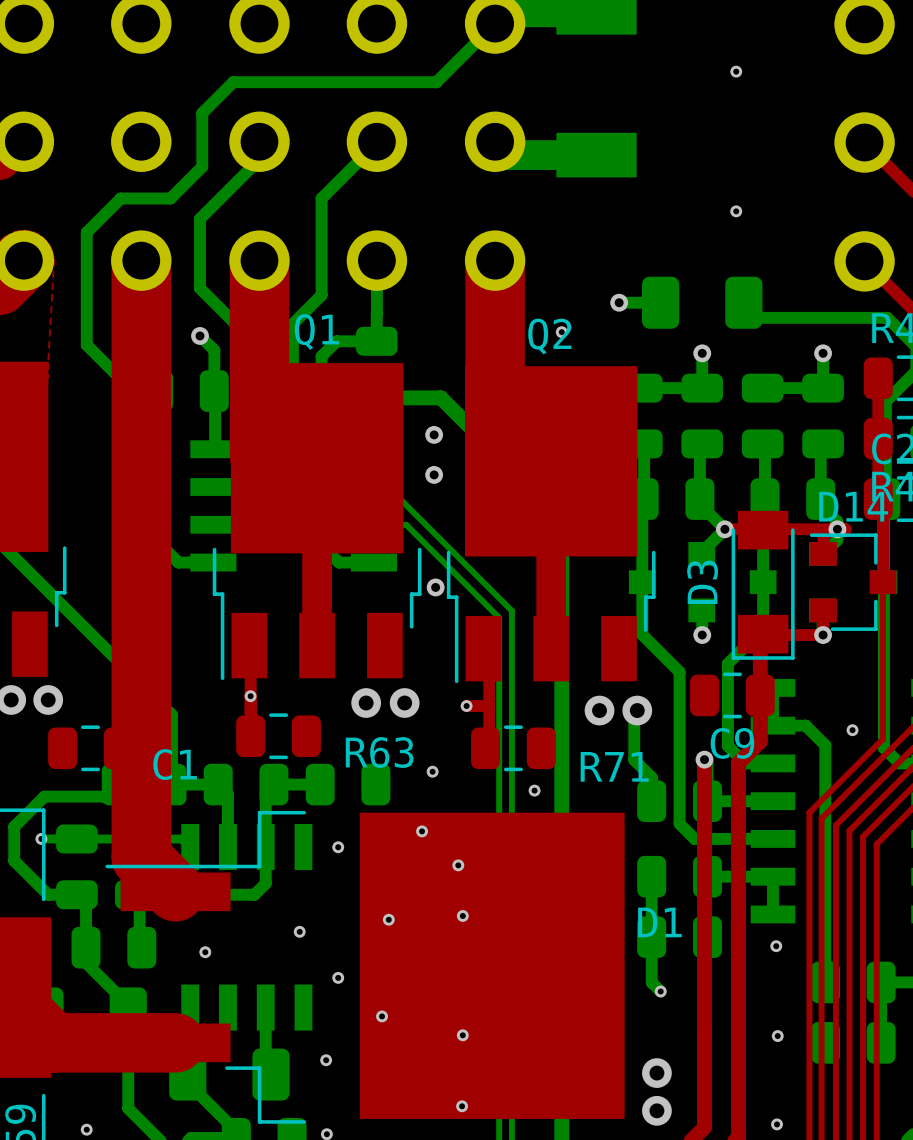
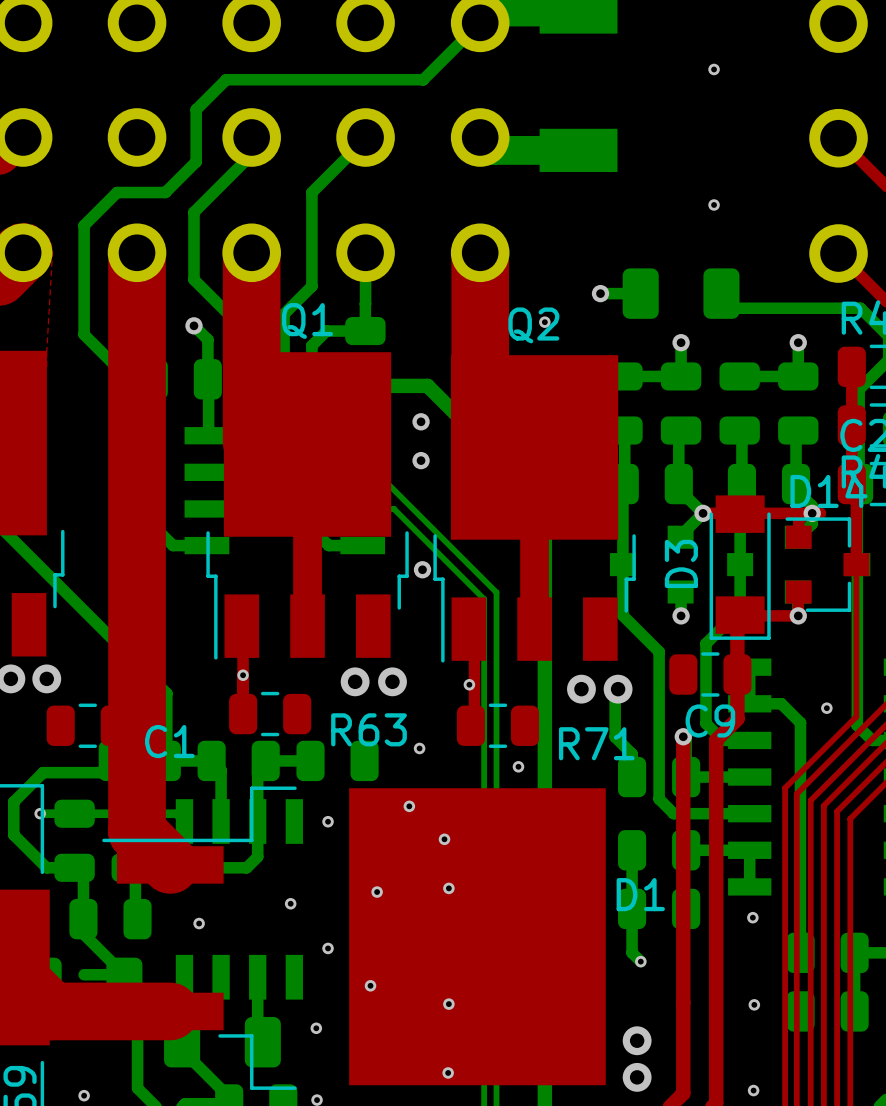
top track: (466, 706) (489, 706) -> none
via position: (466, 706) -> (469, 684)
bottom track: (128, 1014) (128, 1108) (141, 1122) -> (84, 974) (122, 974) (137, 989) (137, 1088)

